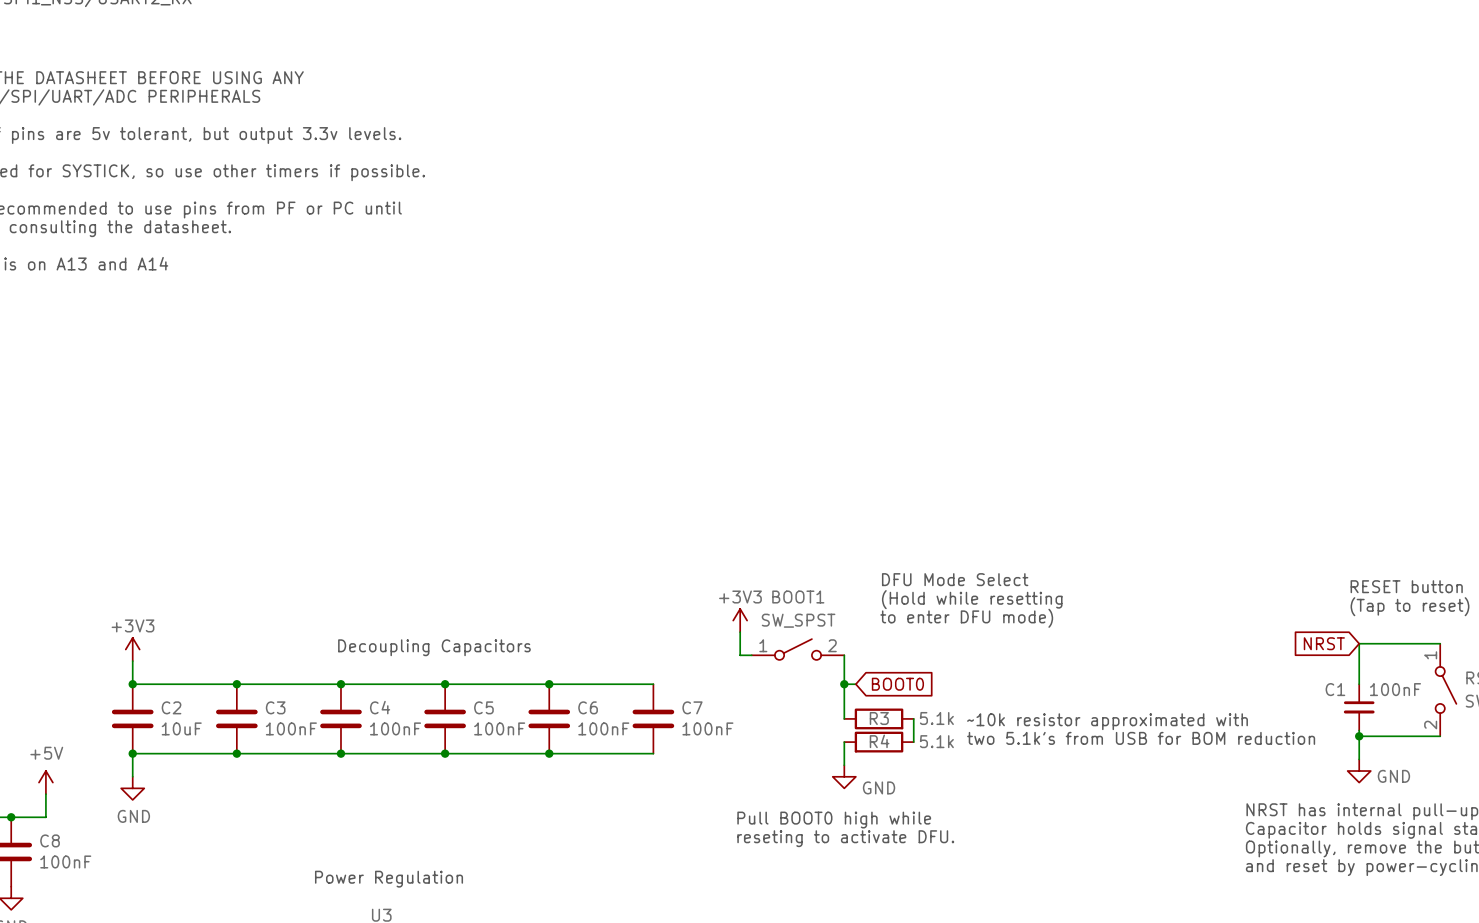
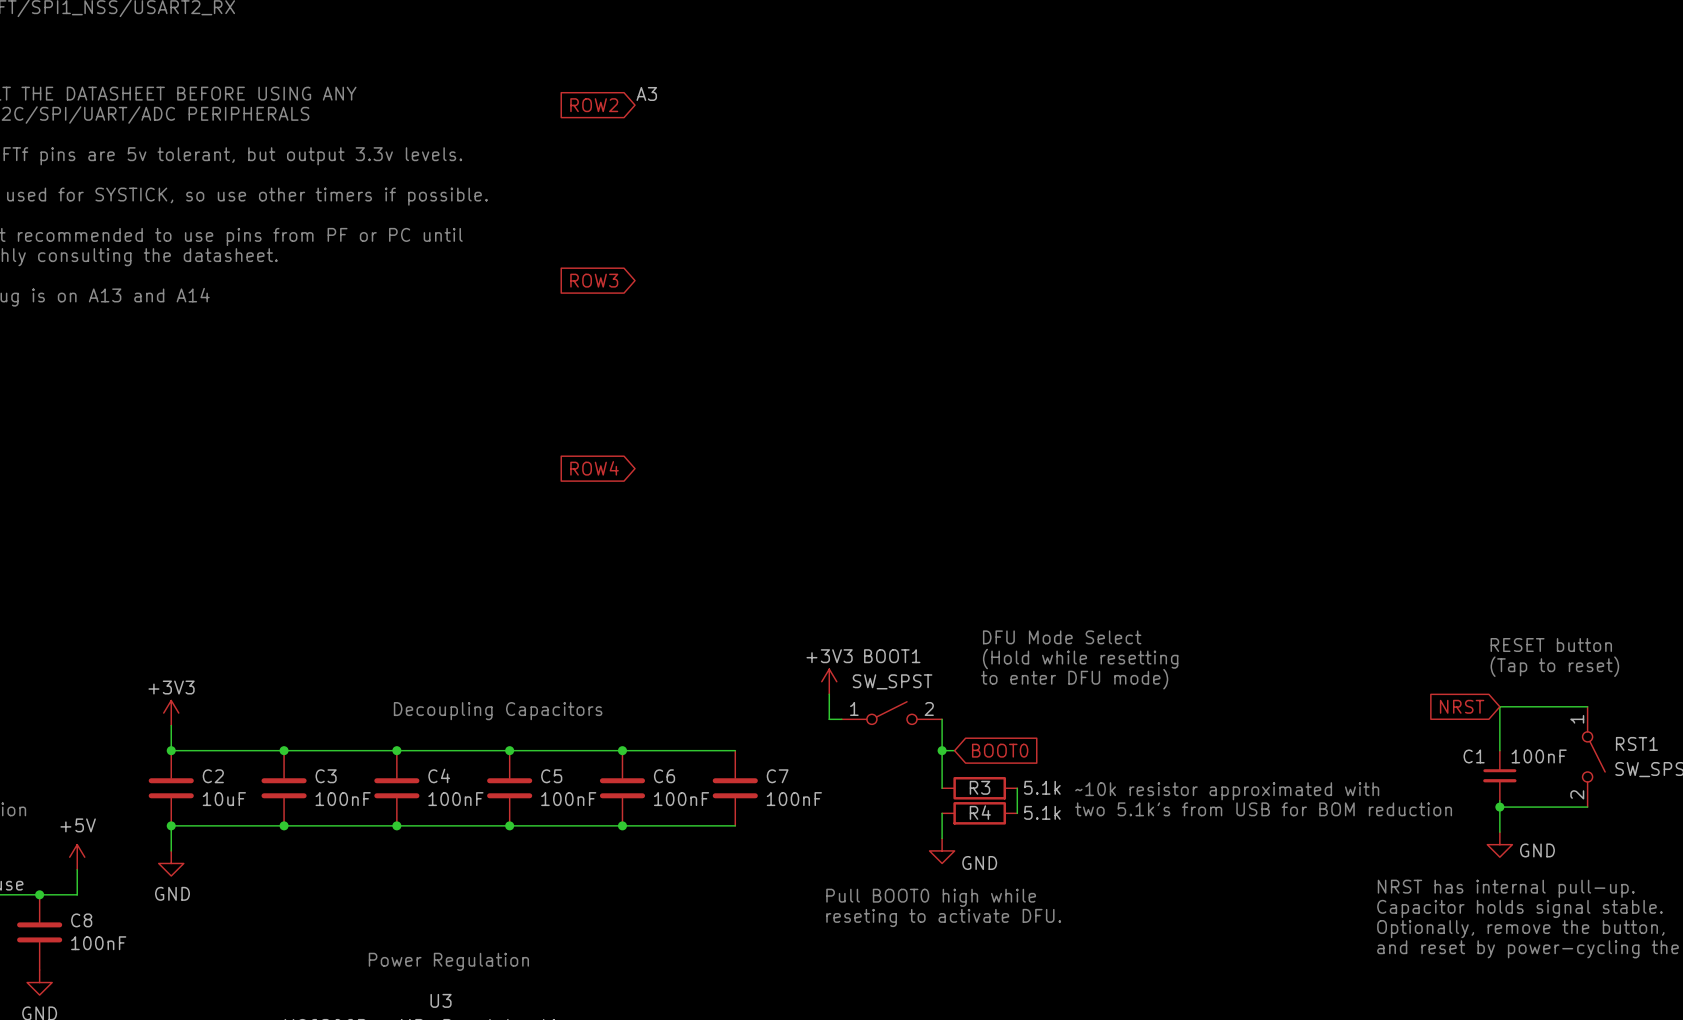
label: none -> A3 (646, 93)
global label: none -> ROW2 (594, 105)
global label: none -> ROW3 (594, 280)
global label: none -> ROW4 (594, 468)

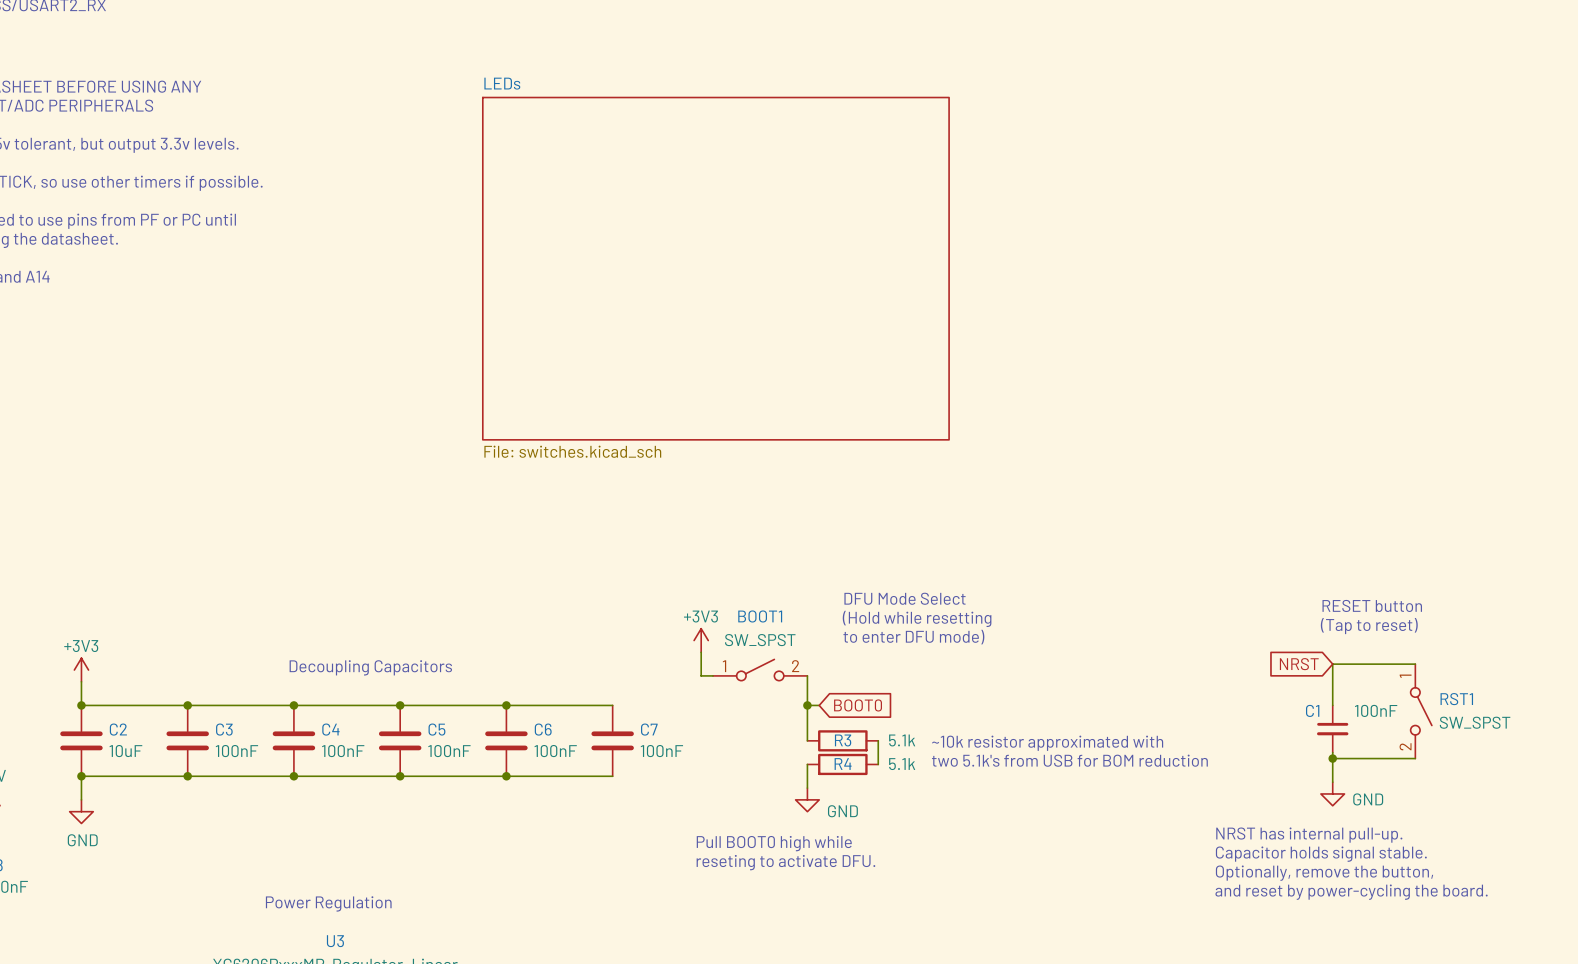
label: A3 (646, 93) -> none
global label: ROW2 (594, 105) -> none
global label: ROW3 (594, 280) -> none
sheet LEDs: none -> File: switches.kicad_sch (715, 268)
global label: ROW4 (594, 468) -> none

